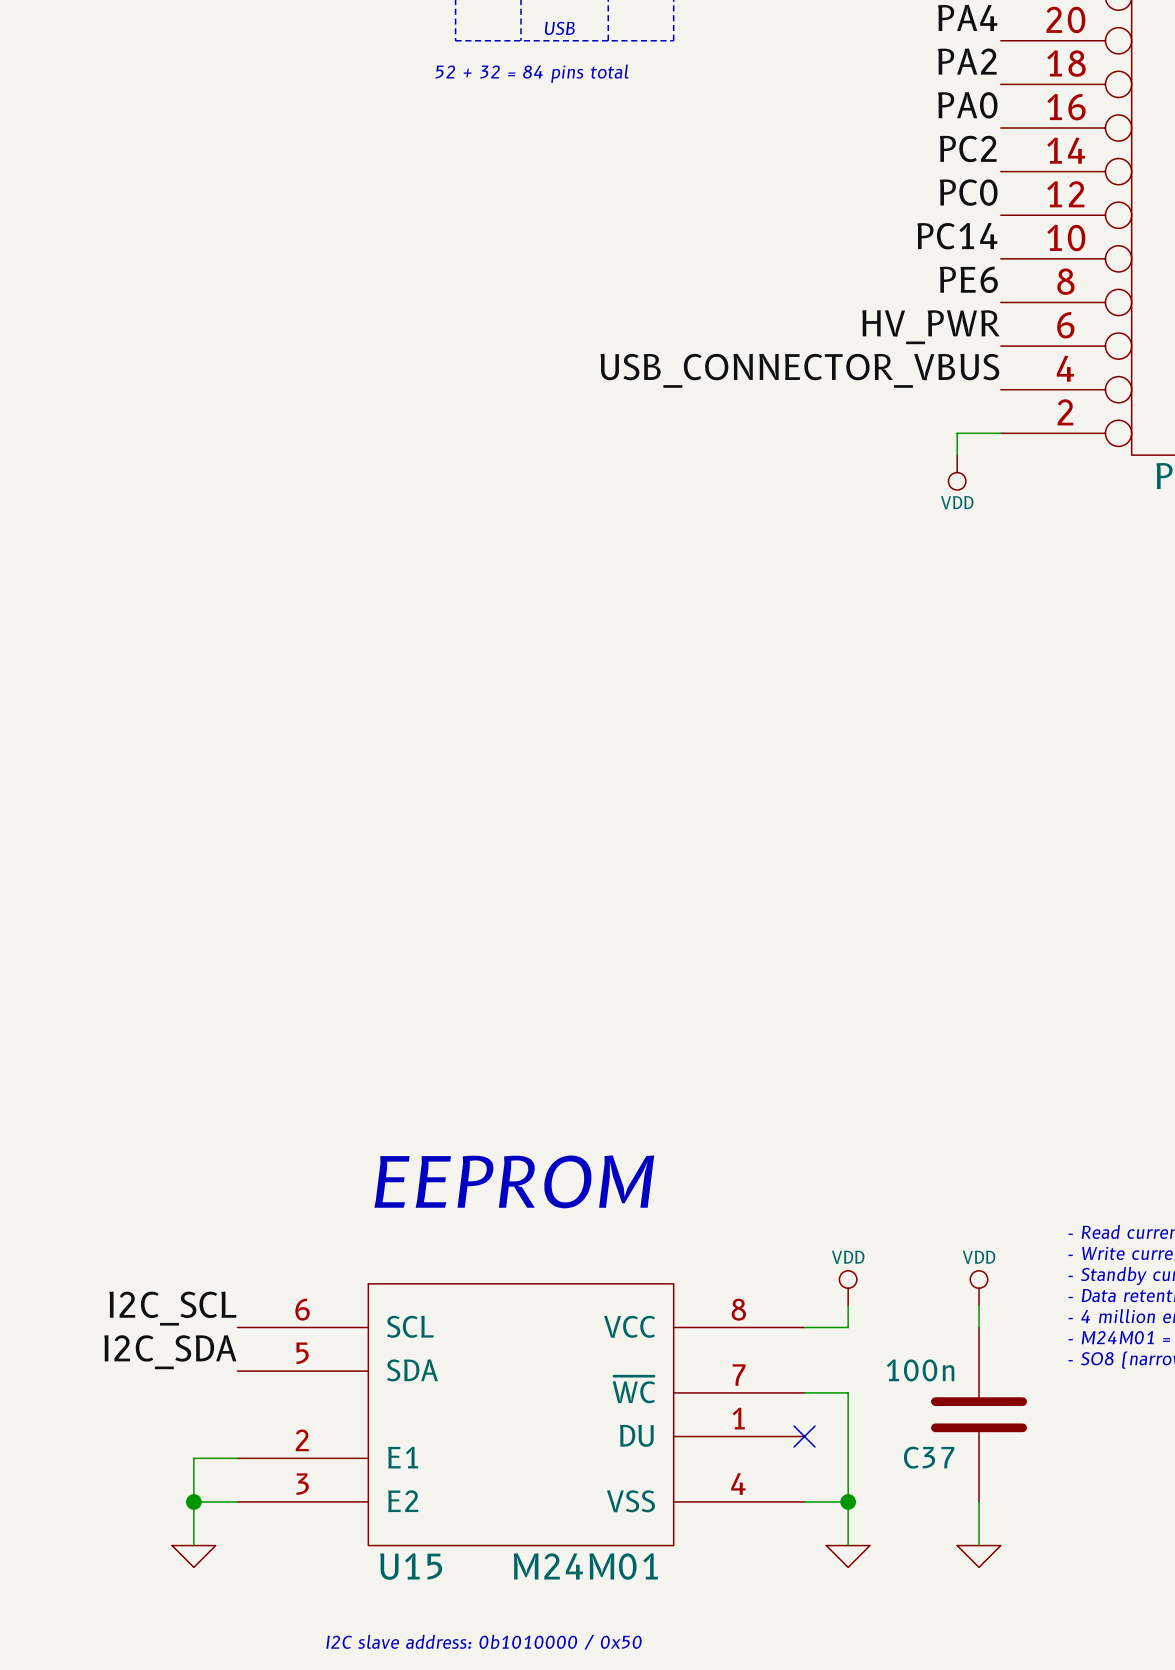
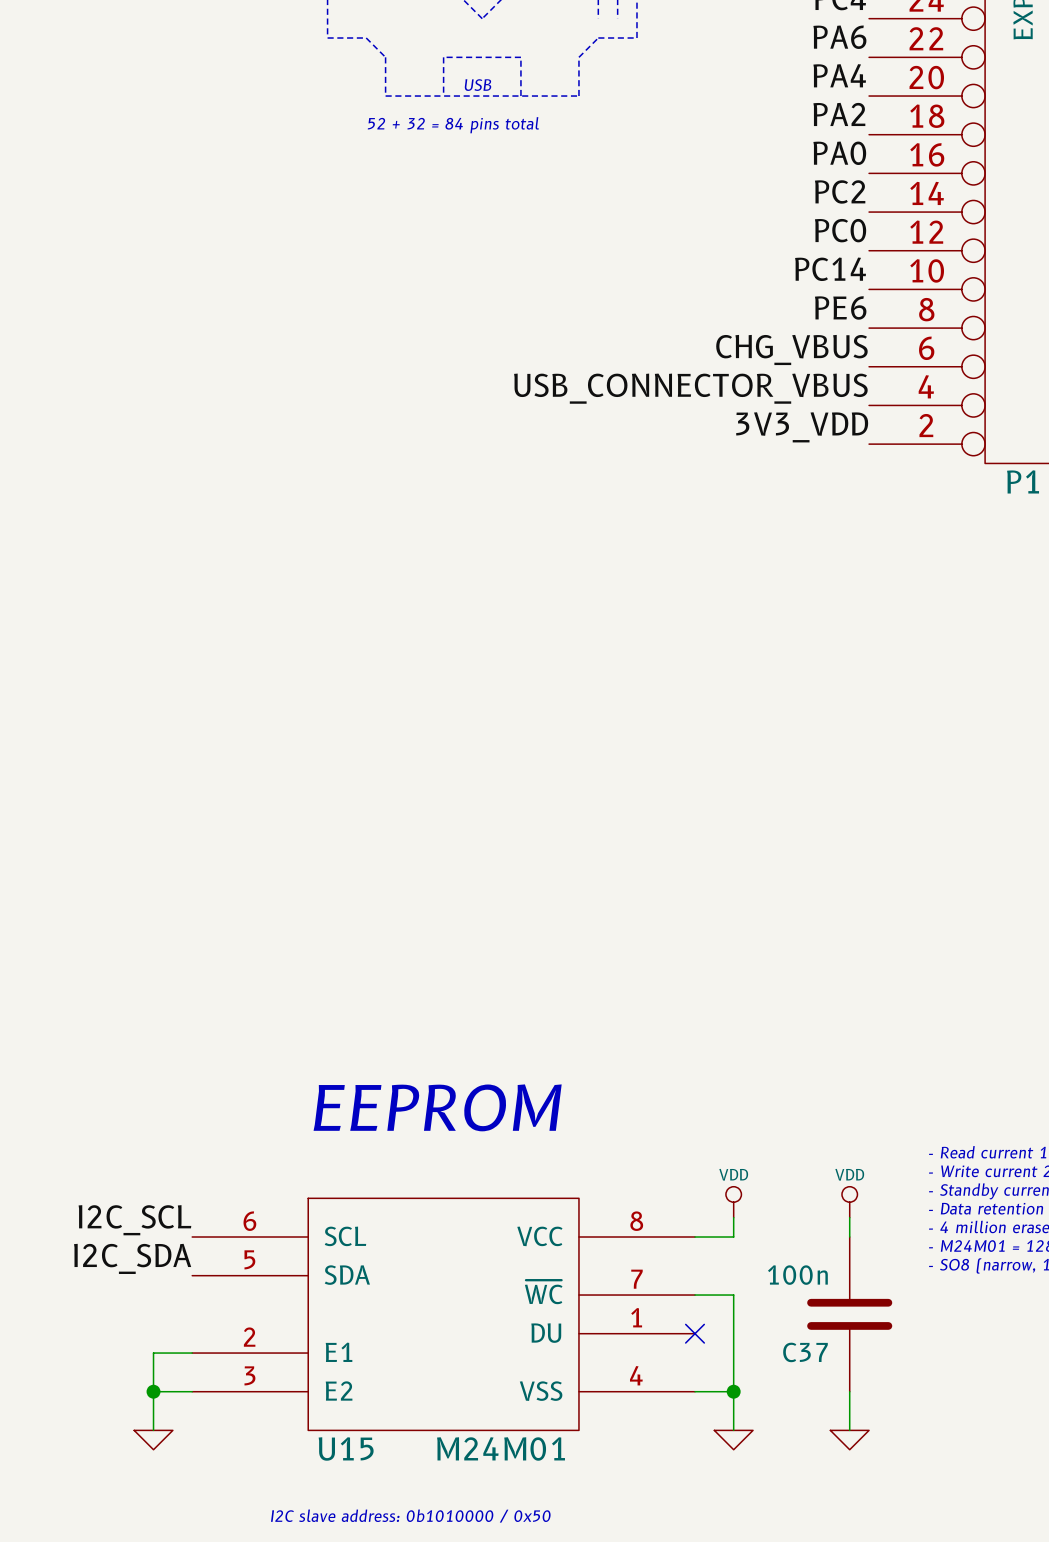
label: HV_PWR (930, 327) -> CHG_VBUS (791, 349)
label: none -> 3V3_VDD (802, 427)
wire: (1000, 433) (957, 433) (957, 455) -> none
power symbol: VDD (957, 472) -> none

